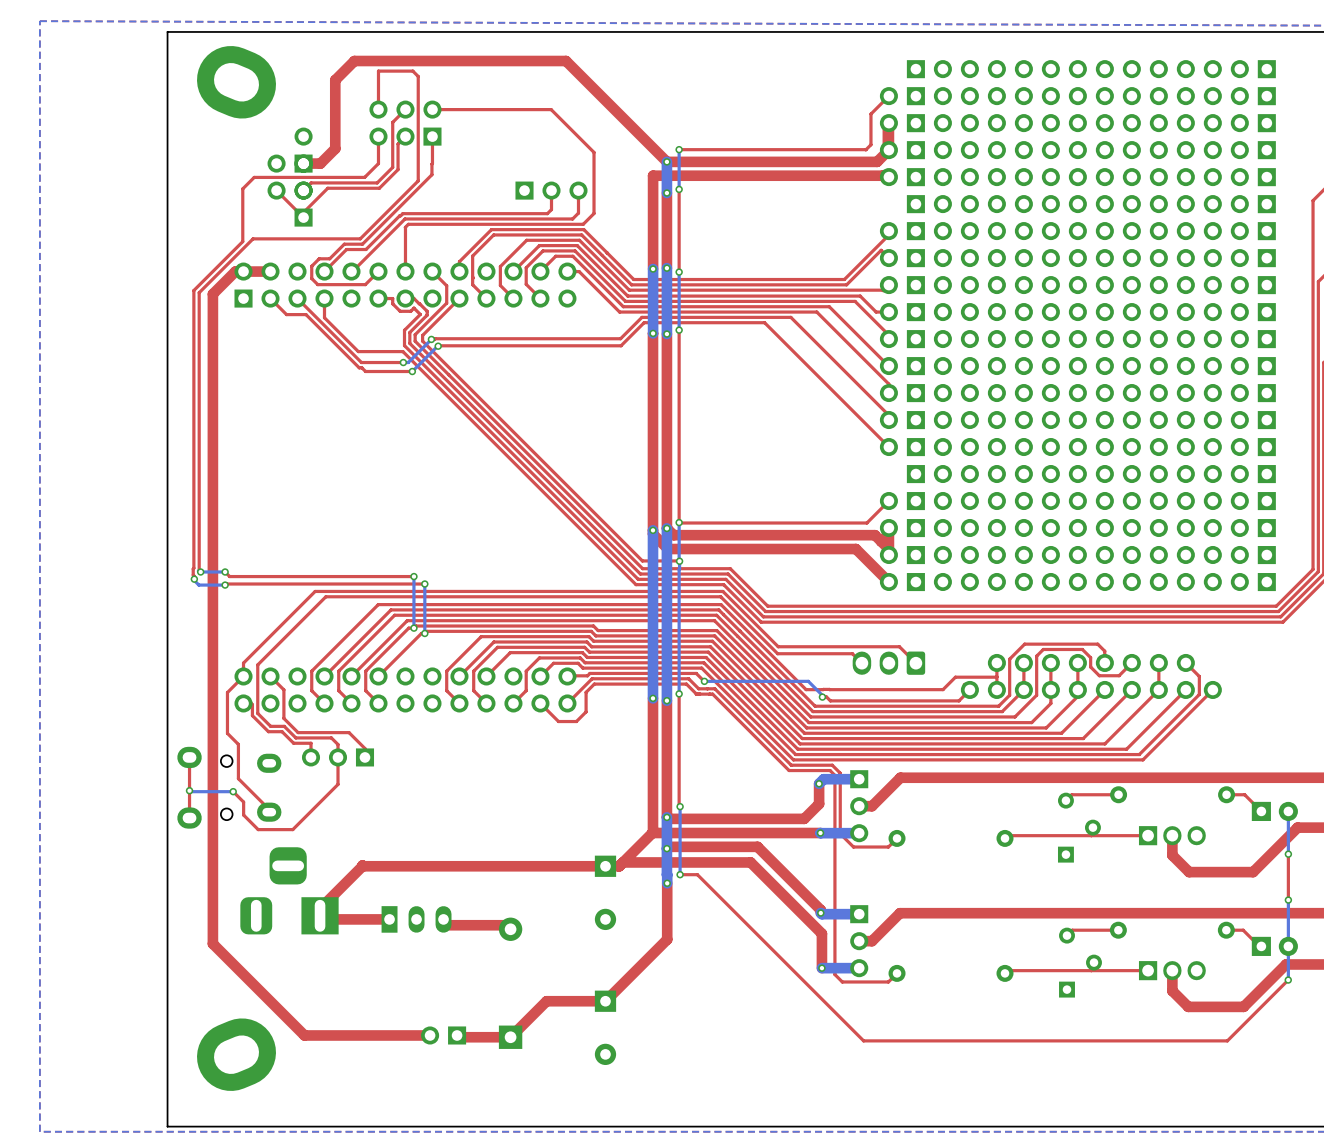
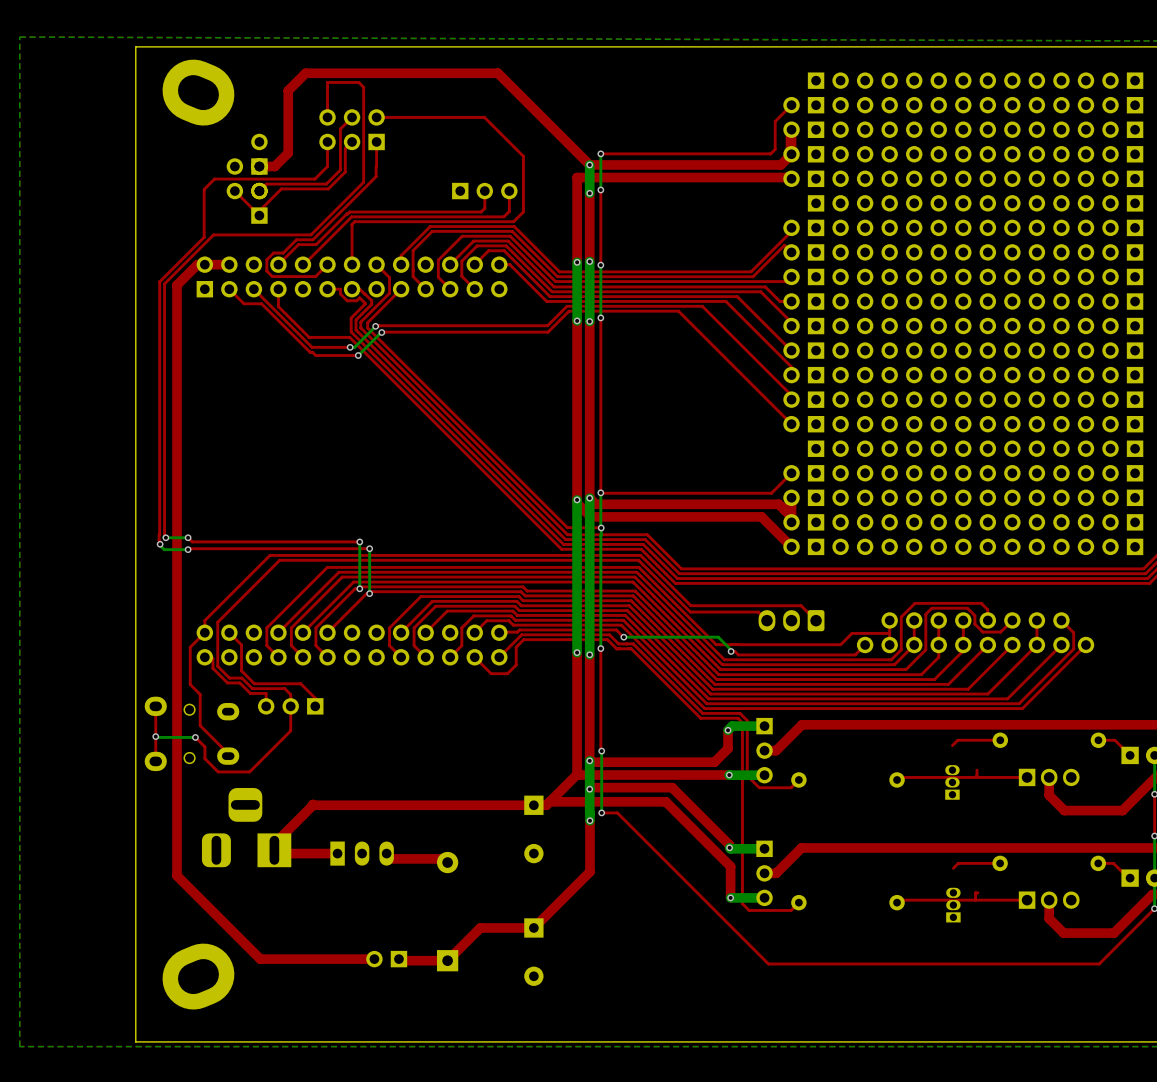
part: (1079, 827) -> none
part: none -> (952, 782)
part: (1080, 962) -> none
part: none -> (953, 905)

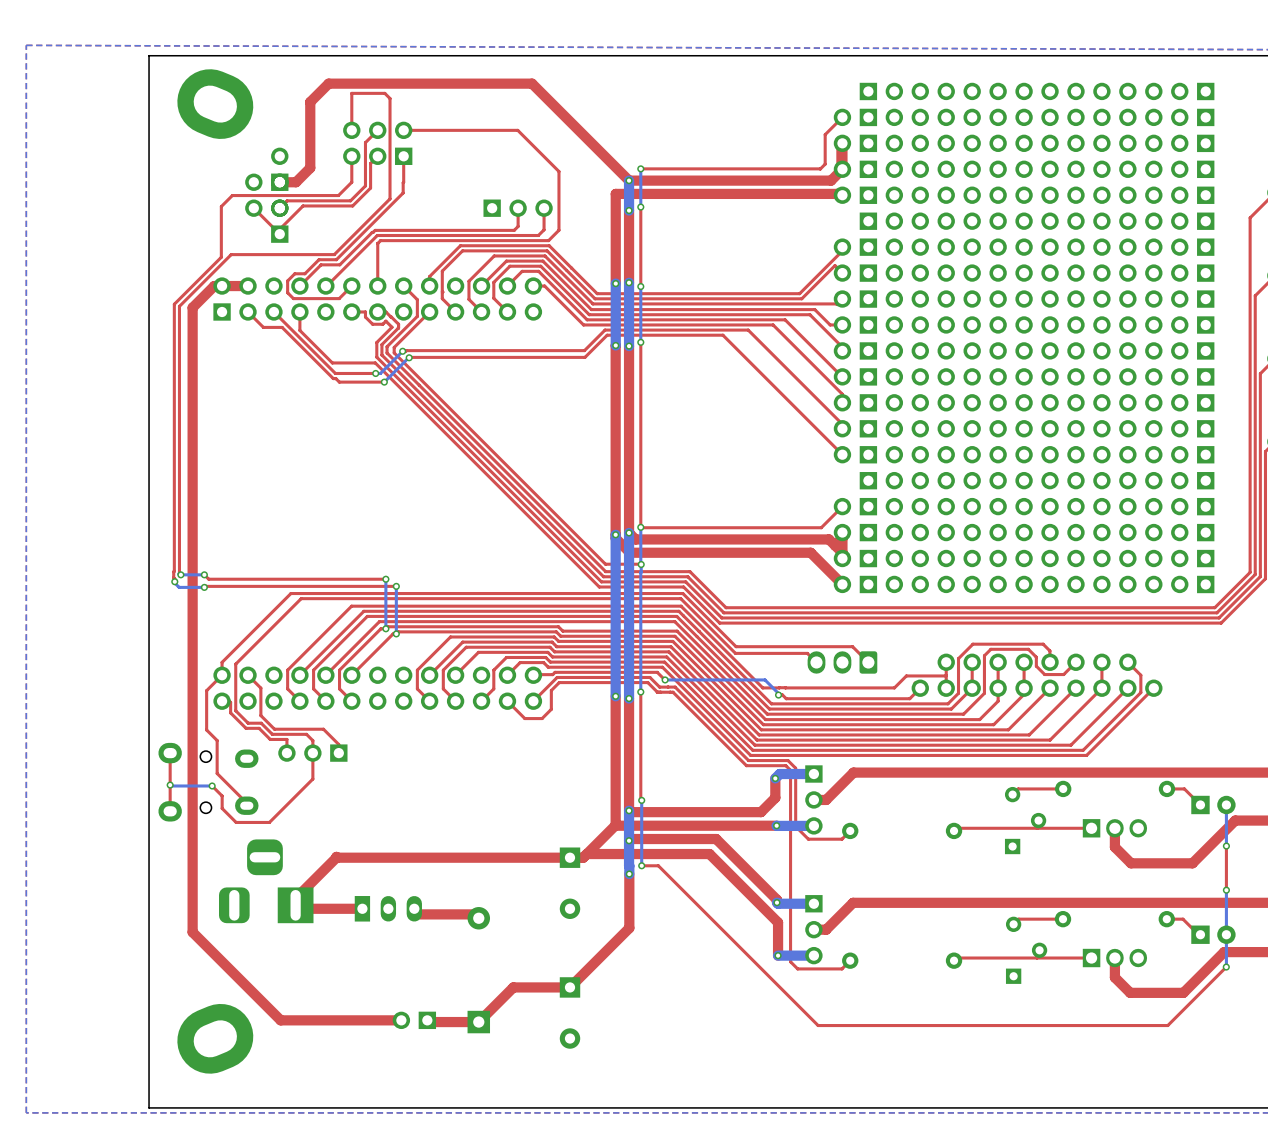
part: none -> (1025, 820)
part: (952, 782) -> none
part: none -> (1026, 950)
part: (953, 905) -> none

